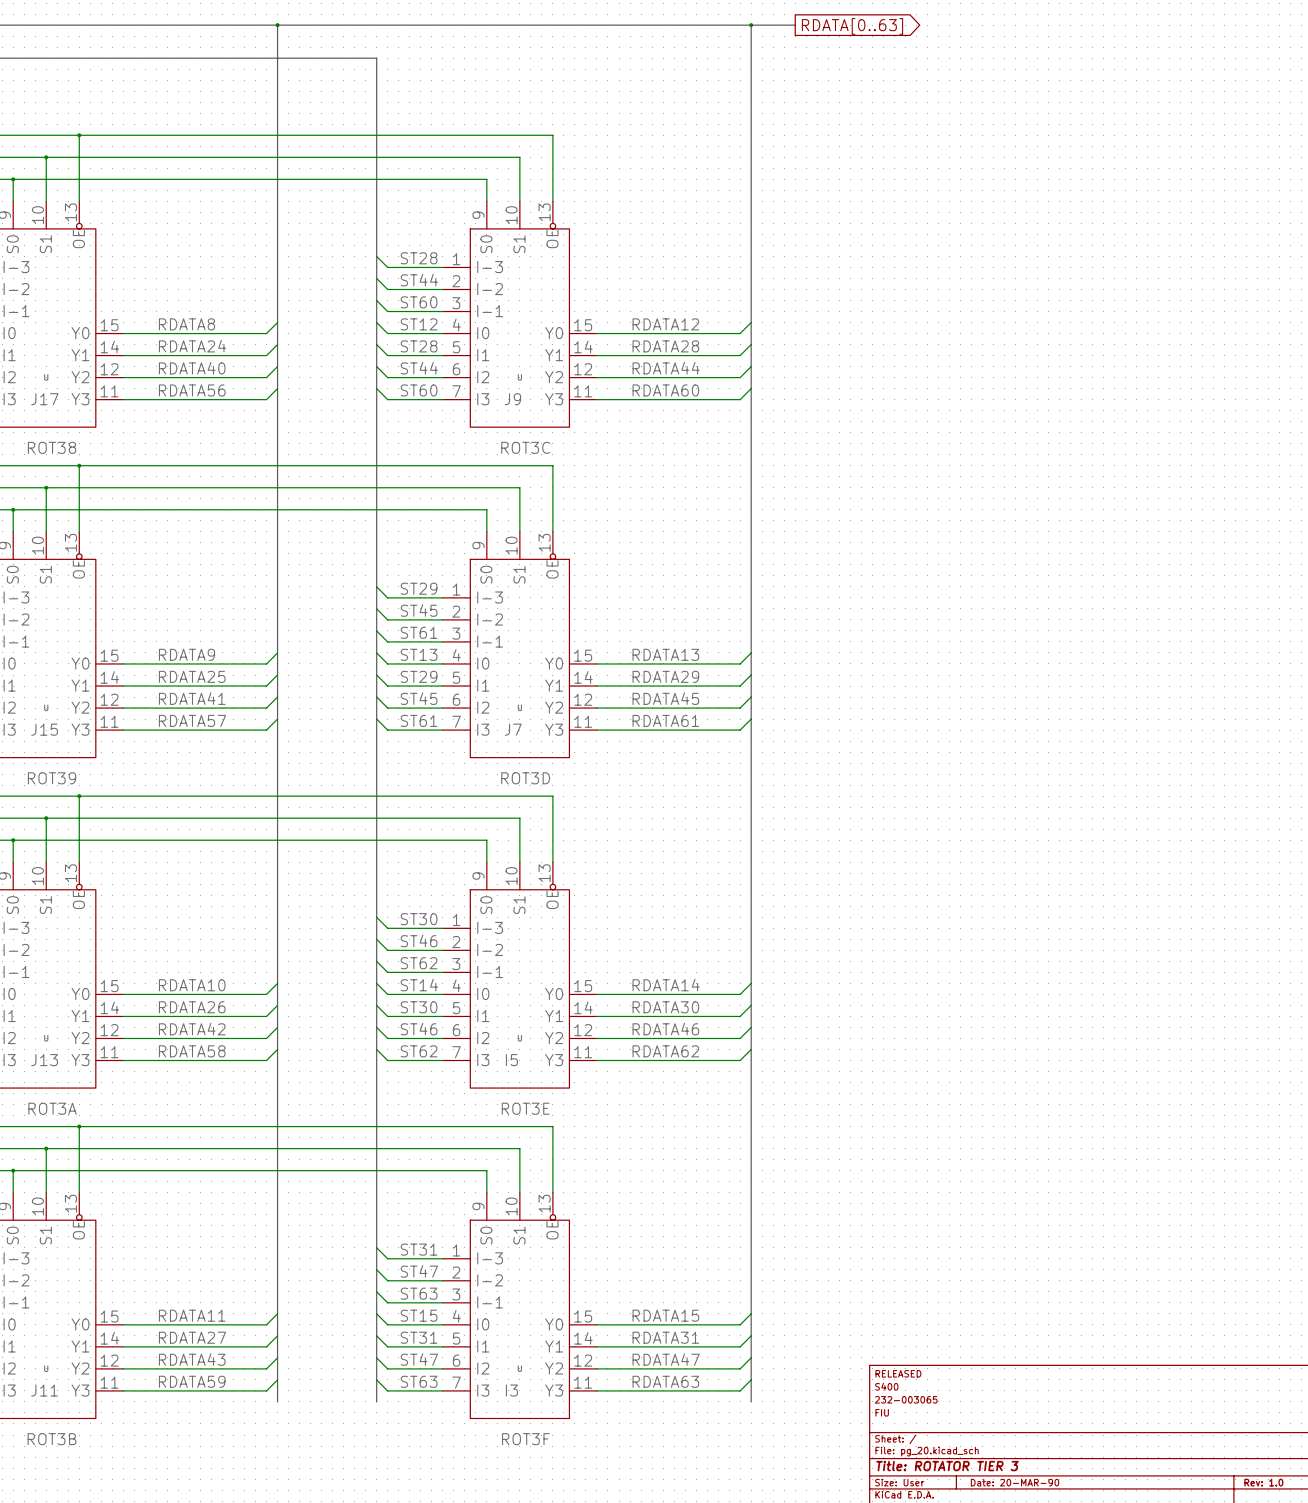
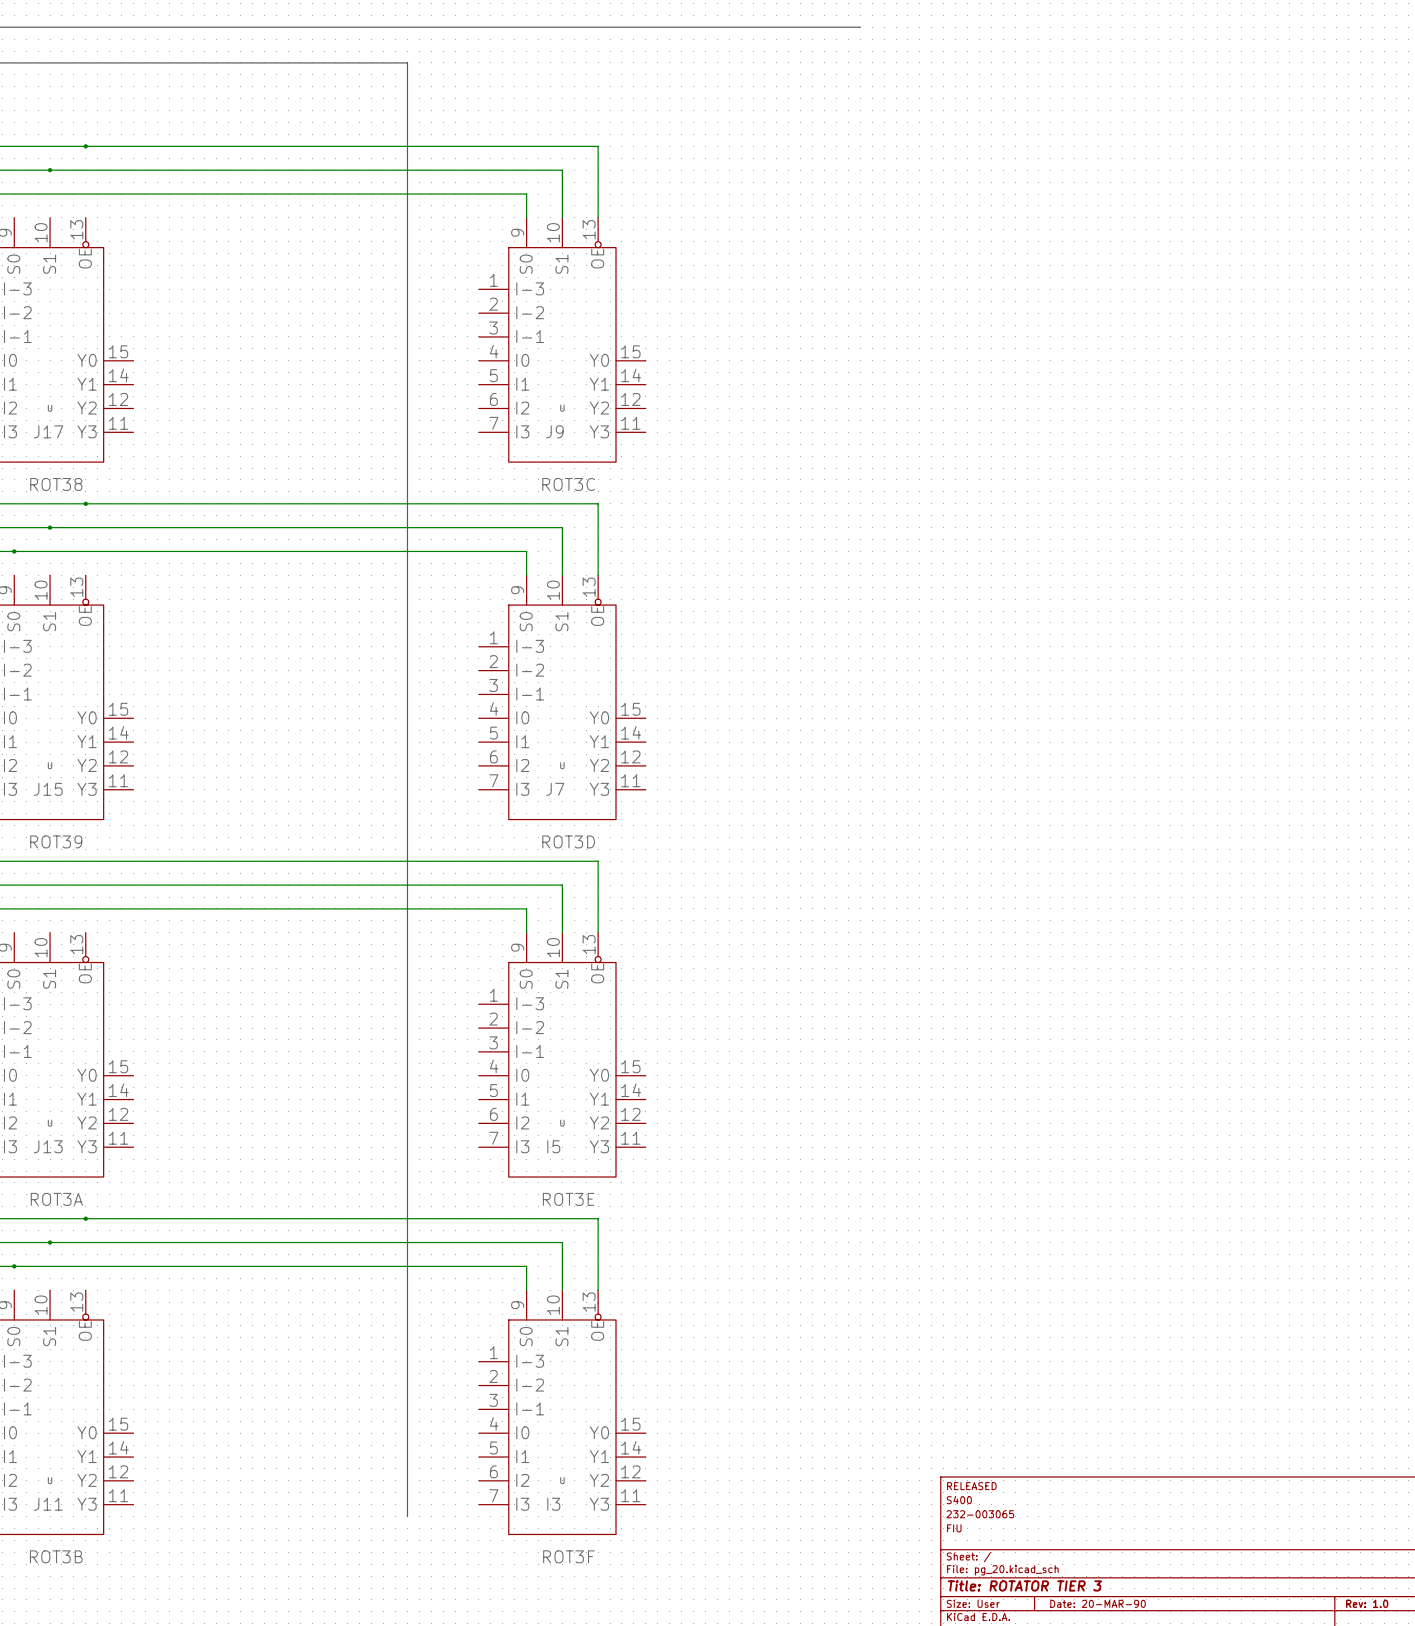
bus: (277, 25) (277, 1401) -> none
junction: (277, 25) -> none
bus: (751, 25) (751, 1401) -> none
junction: (751, 25) -> none
global label: RDATA[0..63] (852, 26) -> none
wire: (79, 135) (79, 201) -> none
wire: (46, 157) (46, 201) -> none
wire: (13, 179) (13, 201) -> none
junction: (13, 179) -> none
wire: (376, 256) (387, 267) (442, 267) -> none
label: ST28 (419, 258) -> none
wire: (376, 278) (387, 289) (442, 289) -> none
label: ST44 (419, 280) -> none
wire: (376, 300) (387, 311) (442, 311) -> none
label: ST60 (419, 302) -> none
wire: (277, 322) (266, 333) (123, 333) -> none
wire: (376, 322) (387, 333) (442, 333) -> none
wire: (751, 322) (740, 333) (596, 333) -> none
label: RDATA8 (186, 324) -> none
label: ST12 (419, 324) -> none
label: RDATA12 (665, 324) -> none
wire: (277, 344) (266, 355) (123, 355) -> none
wire: (376, 344) (387, 355) (442, 355) -> none
wire: (751, 344) (740, 355) (596, 355) -> none
label: RDATA24 (192, 346) -> none
label: ST28 (419, 346) -> none
label: RDATA28 (665, 346) -> none
wire: (277, 366) (266, 377) (123, 377) -> none
wire: (376, 366) (387, 377) (442, 377) -> none
wire: (751, 366) (740, 377) (596, 377) -> none
label: RDATA40 (192, 368) -> none
label: ST44 (419, 368) -> none
label: RDATA44 (666, 368) -> none
wire: (277, 388) (266, 399) (123, 399) -> none
wire: (376, 388) (387, 399) (442, 399) -> none
wire: (751, 388) (740, 399) (596, 399) -> none
label: RDATA56 (192, 390) -> none
label: ST60 (419, 390) -> none
label: RDATA60 (665, 390) -> none
wire: (79, 465) (79, 531) -> none
wire: (46, 487) (46, 531) -> none
wire: (13, 509) (13, 531) -> none
wire: (376, 586) (387, 597) (442, 597) -> none
label: ST29 (419, 588) -> none
wire: (376, 608) (387, 619) (442, 619) -> none
label: ST45 (419, 610) -> none
wire: (376, 630) (387, 641) (442, 641) -> none
label: ST61 (419, 632) -> none
wire: (277, 652) (266, 663) (123, 663) -> none
wire: (376, 652) (387, 663) (442, 663) -> none
wire: (751, 652) (740, 663) (596, 663) -> none
label: RDATA9 (186, 654) -> none
label: ST13 (419, 654) -> none
label: RDATA13 (665, 654) -> none
wire: (277, 675) (266, 686) (123, 686) -> none
wire: (376, 675) (387, 686) (442, 686) -> none
wire: (751, 675) (740, 686) (596, 686) -> none
label: RDATA25 (192, 676) -> none
label: ST29 (419, 676) -> none
label: RDATA29 (665, 676) -> none
wire: (277, 697) (266, 708) (123, 708) -> none
wire: (376, 697) (387, 708) (442, 708) -> none
wire: (751, 697) (740, 708) (596, 708) -> none
label: RDATA41 (192, 698) -> none
label: ST45 (419, 698) -> none
label: RDATA45 (665, 698) -> none
wire: (277, 719) (266, 730) (123, 730) -> none
wire: (376, 719) (387, 730) (442, 730) -> none
wire: (751, 719) (740, 730) (596, 730) -> none
label: RDATA57 (192, 720) -> none
label: ST61 (419, 720) -> none
label: RDATA61 (665, 720) -> none
wire: (79, 796) (79, 862) -> none
junction: (79, 796) -> none
wire: (46, 818) (46, 862) -> none
junction: (46, 818) -> none
wire: (13, 840) (13, 862) -> none
junction: (13, 840) -> none
wire: (376, 917) (387, 928) (442, 928) -> none
label: ST30 (419, 919) -> none
wire: (376, 939) (387, 950) (442, 950) -> none
label: ST46 (419, 940) -> none
wire: (376, 961) (387, 972) (442, 972) -> none
label: ST62 (419, 963) -> none
wire: (277, 983) (266, 994) (123, 994) -> none
wire: (376, 983) (387, 994) (442, 994) -> none
wire: (751, 983) (740, 994) (596, 994) -> none
label: ST14 (419, 984) -> none
label: RDATA14 (666, 984) -> none
label: RDATA10 (192, 985) -> none
wire: (277, 1005) (266, 1016) (123, 1016) -> none
wire: (376, 1005) (387, 1016) (442, 1016) -> none
wire: (751, 1005) (740, 1016) (596, 1016) -> none
label: RDATA26 (192, 1007) -> none
label: ST30 (419, 1007) -> none
label: RDATA30 (665, 1007) -> none
wire: (277, 1027) (266, 1038) (123, 1038) -> none
wire: (376, 1027) (387, 1038) (442, 1038) -> none
wire: (751, 1027) (740, 1038) (596, 1038) -> none
label: RDATA42 (192, 1029) -> none
label: ST46 (419, 1029) -> none
label: RDATA46 (665, 1029) -> none
wire: (277, 1049) (266, 1060) (123, 1060) -> none
wire: (376, 1049) (387, 1060) (442, 1060) -> none
wire: (751, 1049) (740, 1060) (596, 1060) -> none
label: RDATA58 (192, 1051) -> none
label: ST62 (419, 1051) -> none
label: RDATA62 (665, 1051) -> none
wire: (79, 1126) (79, 1192) -> none
wire: (46, 1148) (46, 1192) -> none
wire: (13, 1170) (13, 1192) -> none
wire: (376, 1247) (387, 1258) (442, 1258) -> none
label: ST31 (419, 1249) -> none
wire: (376, 1269) (387, 1280) (442, 1280) -> none
label: ST47 (419, 1271) -> none
wire: (376, 1291) (387, 1302) (442, 1302) -> none
label: ST63 (419, 1293) -> none
wire: (277, 1313) (266, 1324) (123, 1324) -> none
wire: (376, 1313) (387, 1324) (442, 1324) -> none
wire: (751, 1313) (740, 1324) (596, 1324) -> none
label: RDATA11 (192, 1315) -> none
label: ST15 (419, 1315) -> none
label: RDATA15 (665, 1315) -> none
wire: (277, 1335) (266, 1346) (123, 1346) -> none
wire: (376, 1335) (387, 1346) (442, 1346) -> none
wire: (751, 1335) (740, 1346) (596, 1346) -> none
label: RDATA27 (192, 1337) -> none
label: ST31 (419, 1337) -> none
label: RDATA31 (665, 1337) -> none
wire: (277, 1357) (266, 1368) (123, 1368) -> none
wire: (376, 1357) (387, 1368) (442, 1368) -> none
wire: (751, 1357) (740, 1368) (596, 1368) -> none
label: RDATA43 (192, 1359) -> none
label: ST47 (419, 1359) -> none
label: RDATA47 (666, 1359) -> none
wire: (277, 1379) (266, 1390) (123, 1390) -> none
wire: (376, 1379) (387, 1390) (442, 1390) -> none
wire: (751, 1379) (740, 1390) (596, 1390) -> none
label: RDATA59 (192, 1381) -> none
label: ST63 (419, 1381) -> none
label: RDATA63 (665, 1381) -> none

